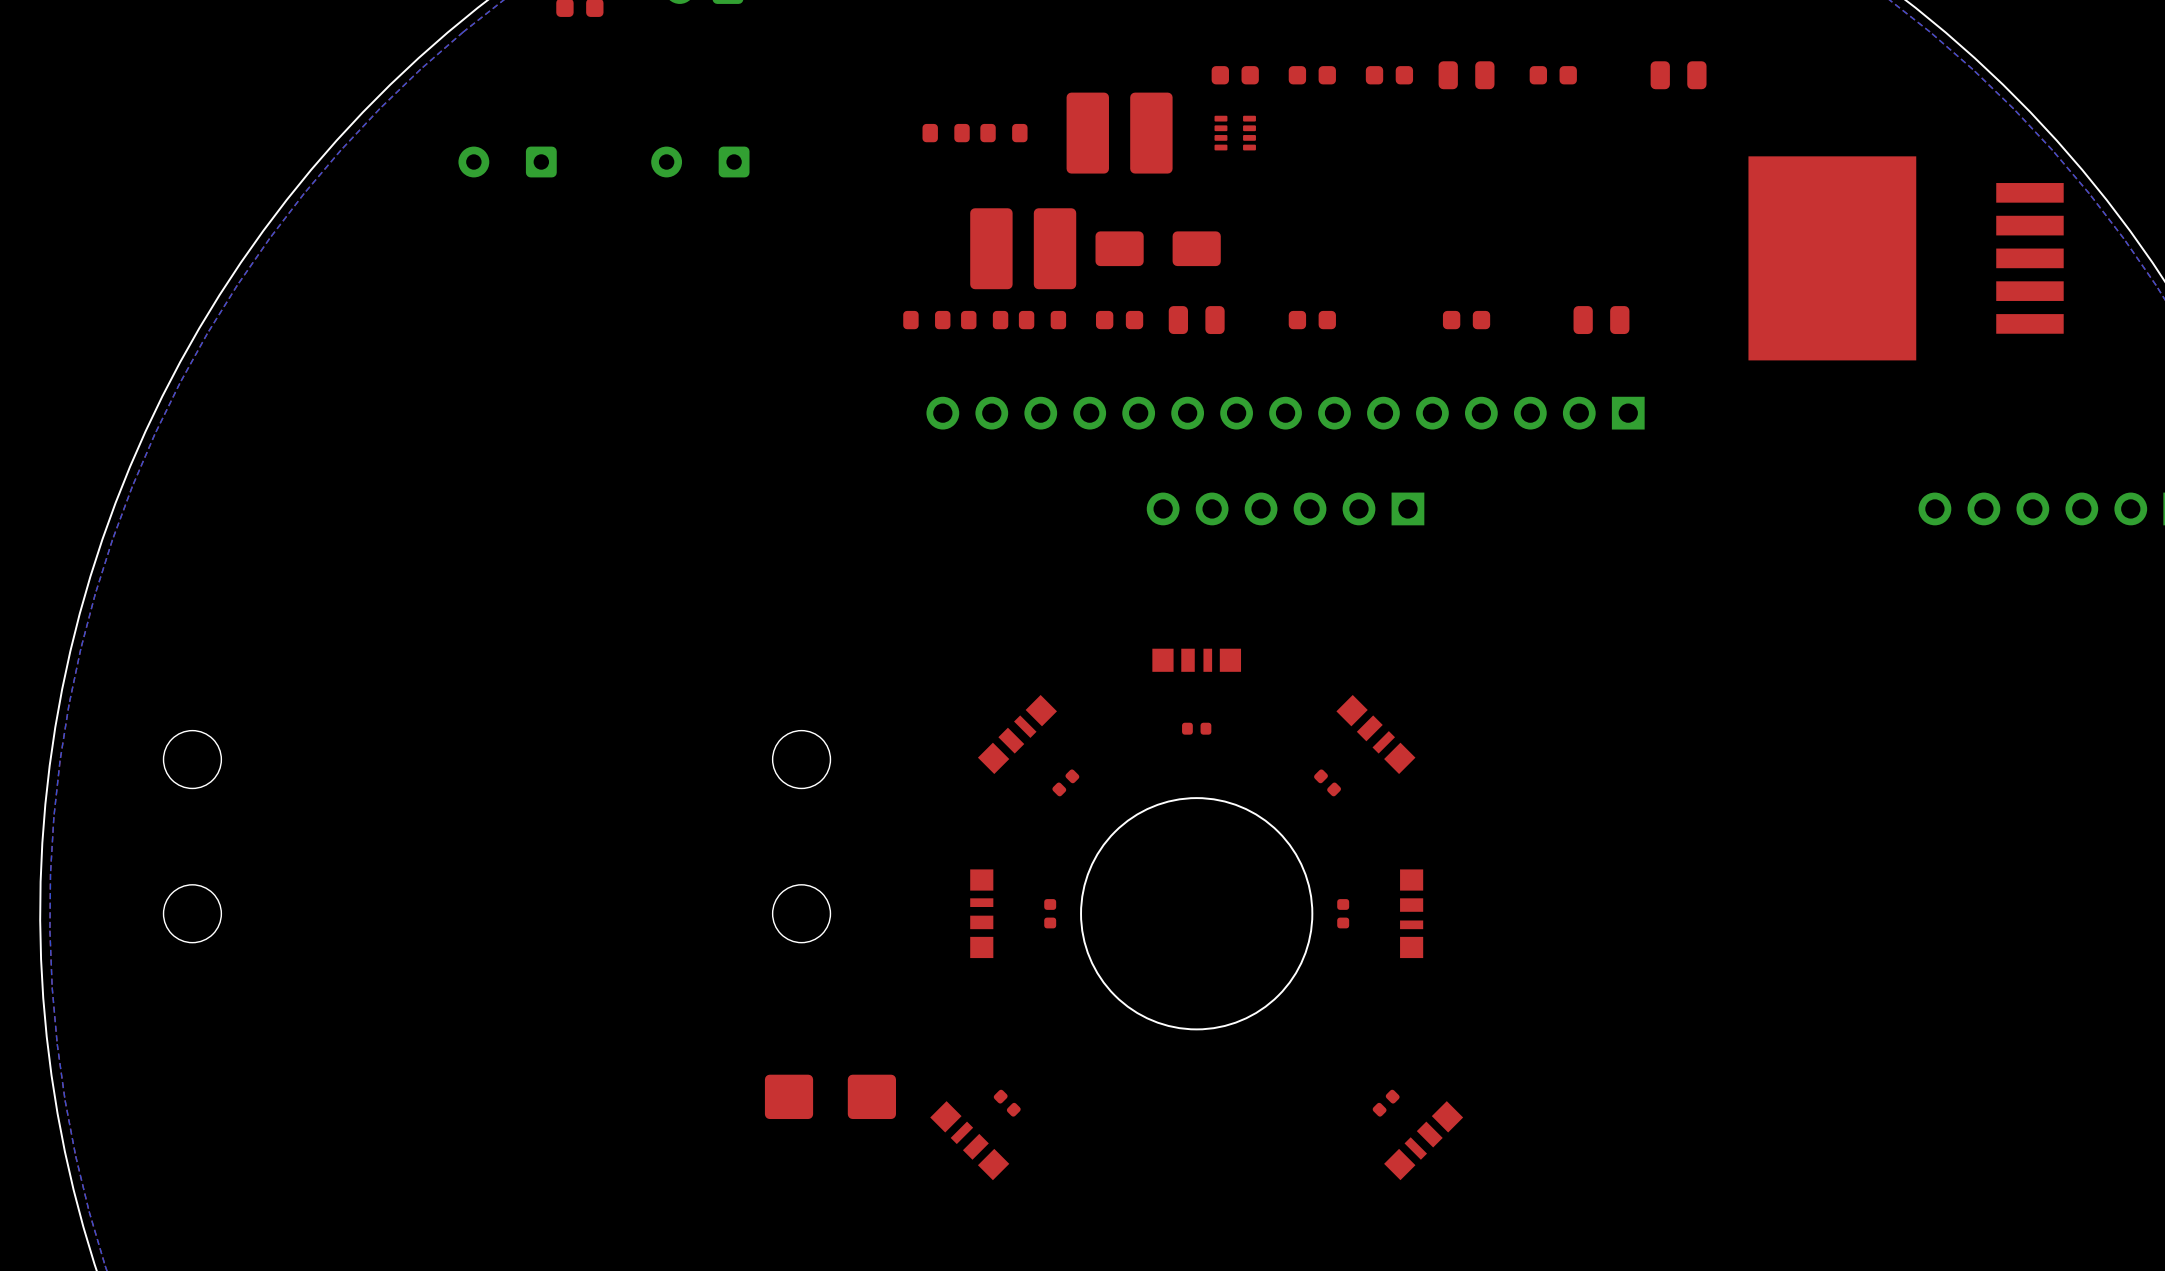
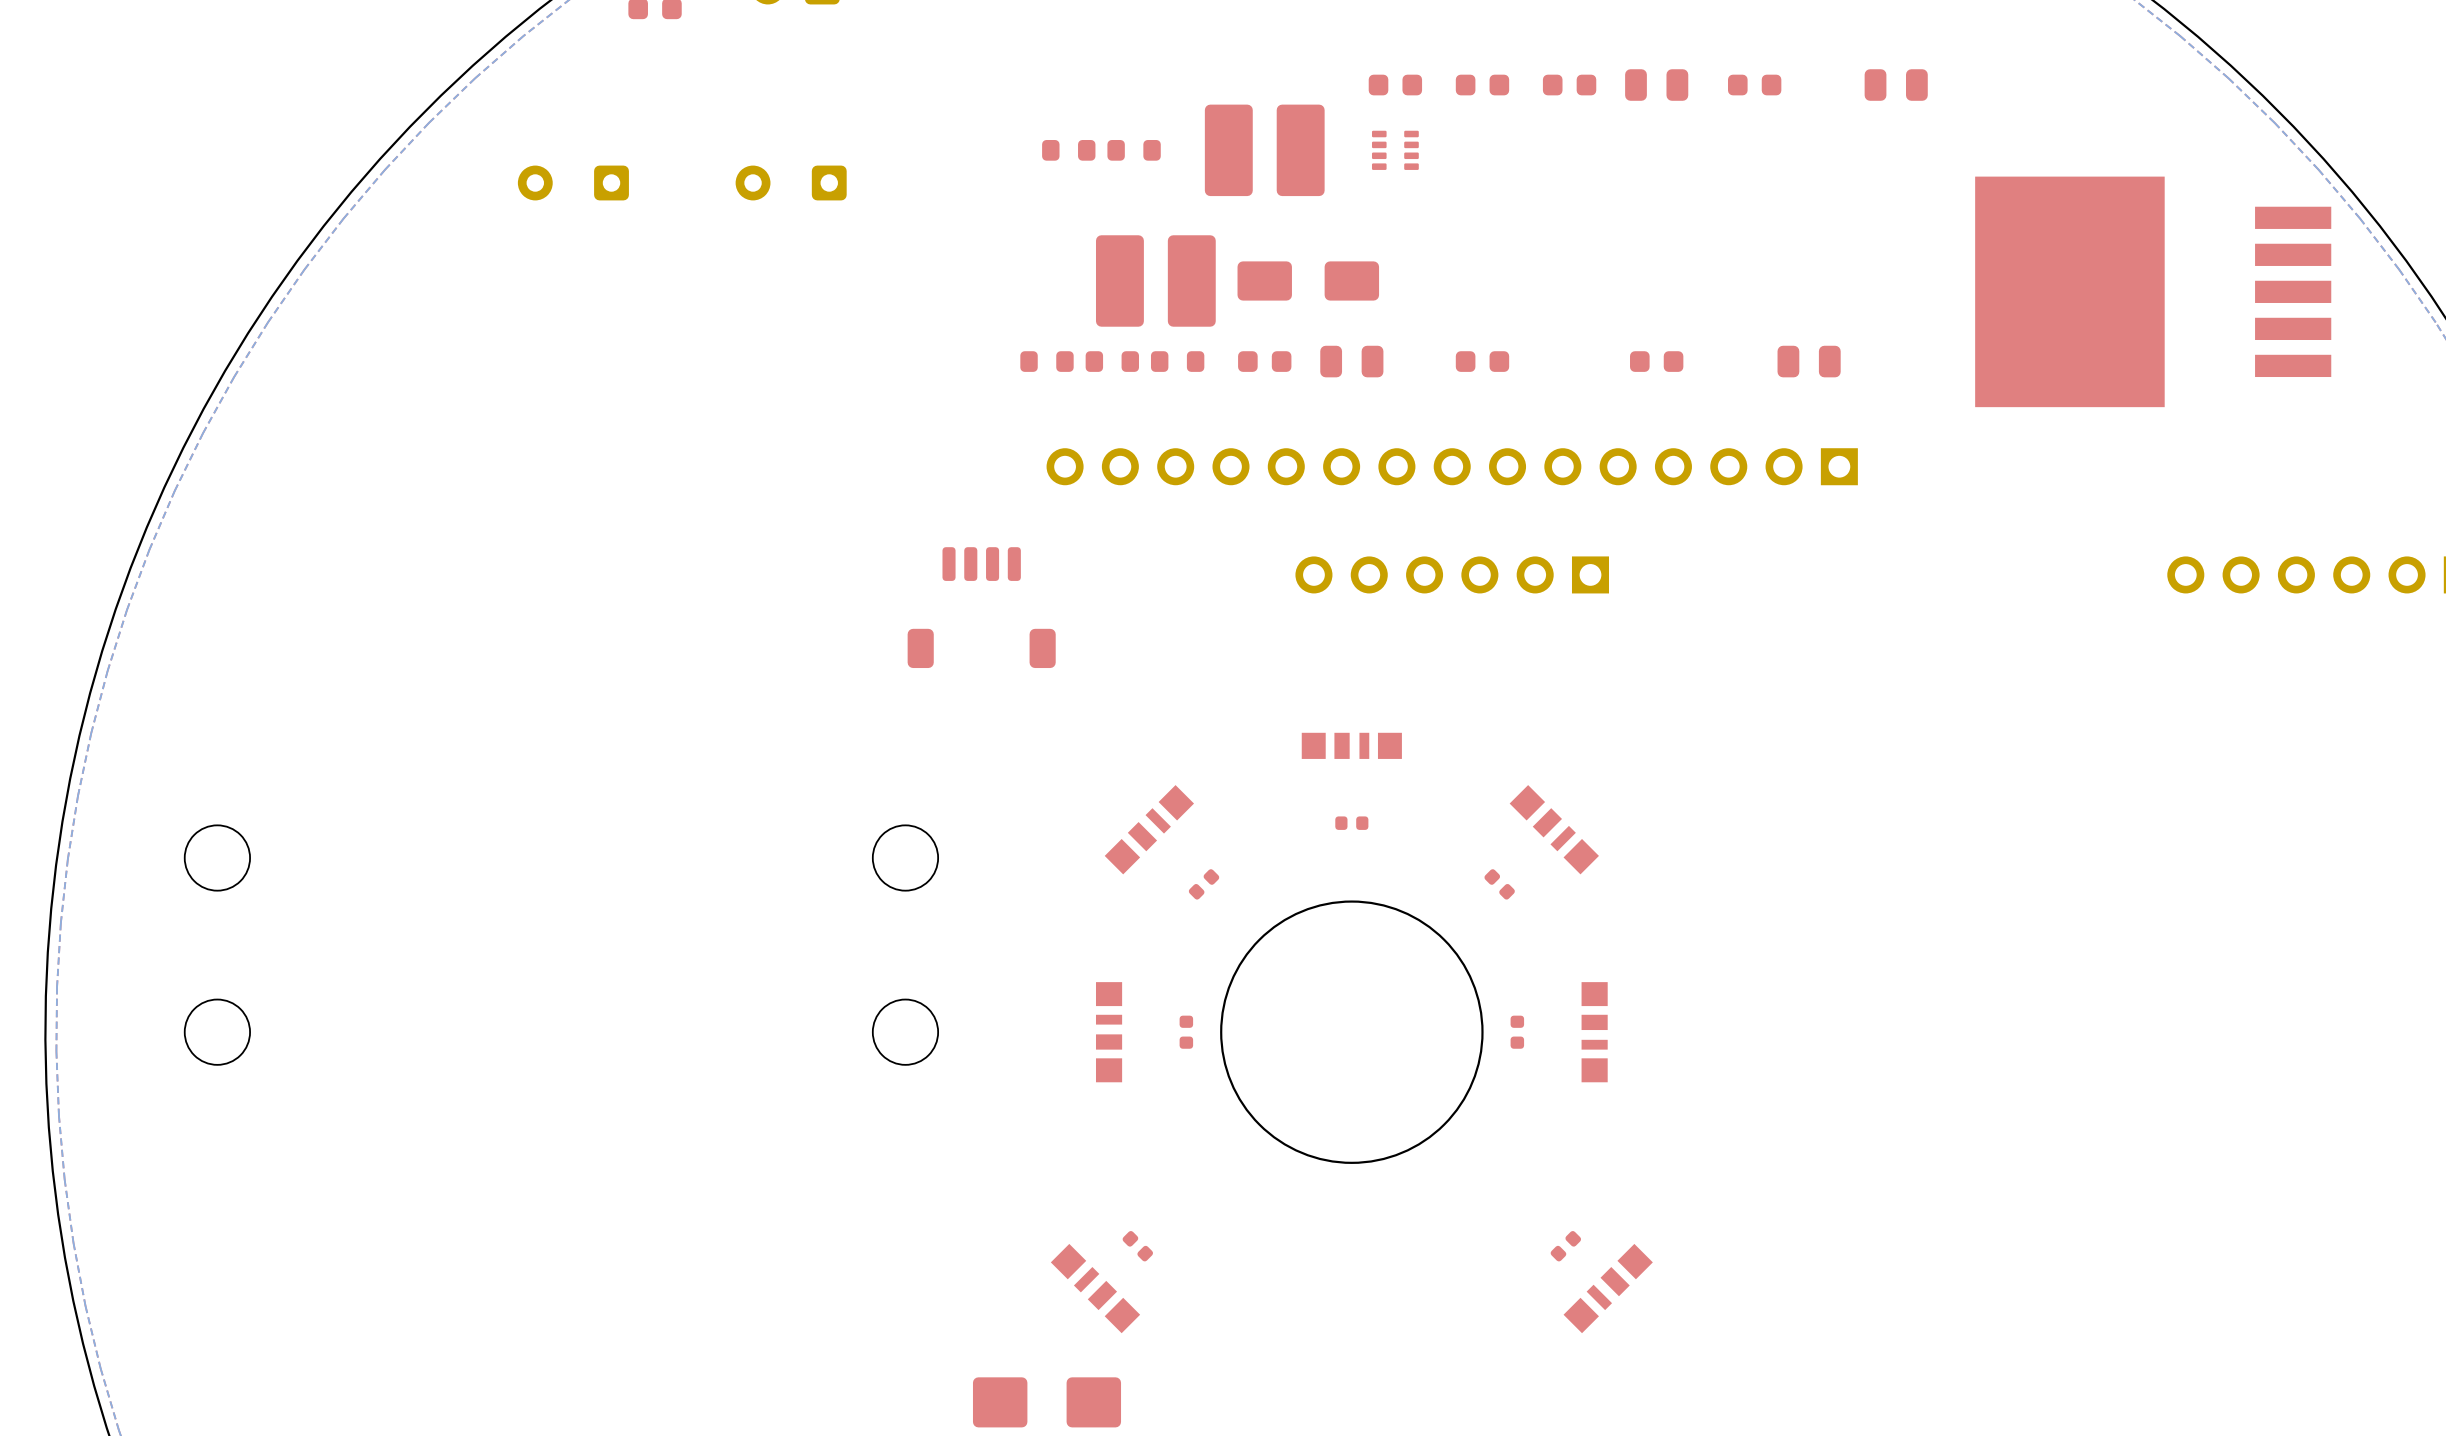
part: none -> (981, 607)
part position: (830, 1096) -> (1047, 1402)

